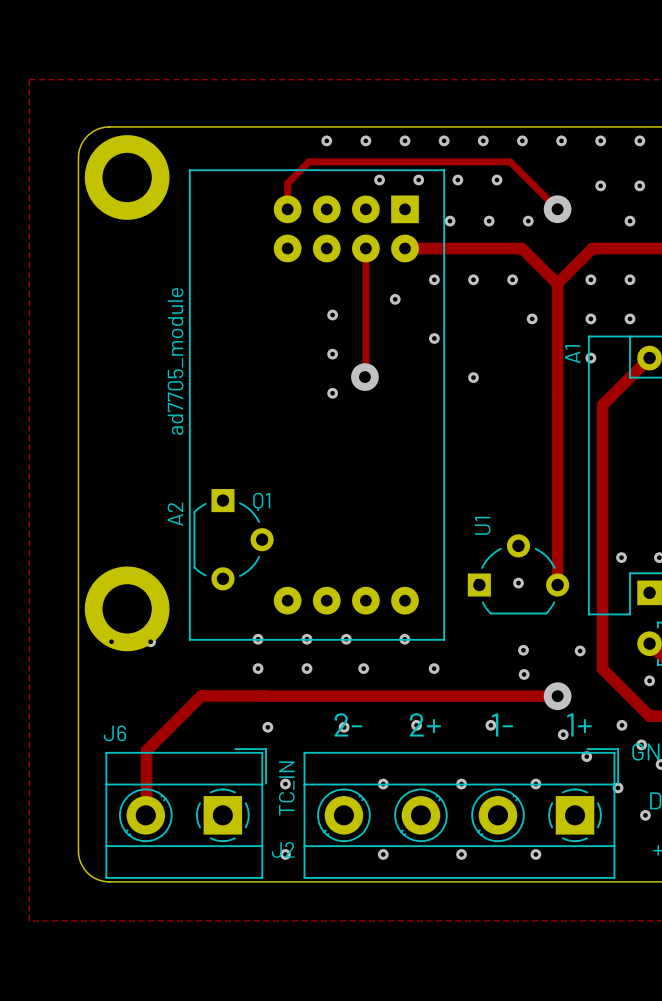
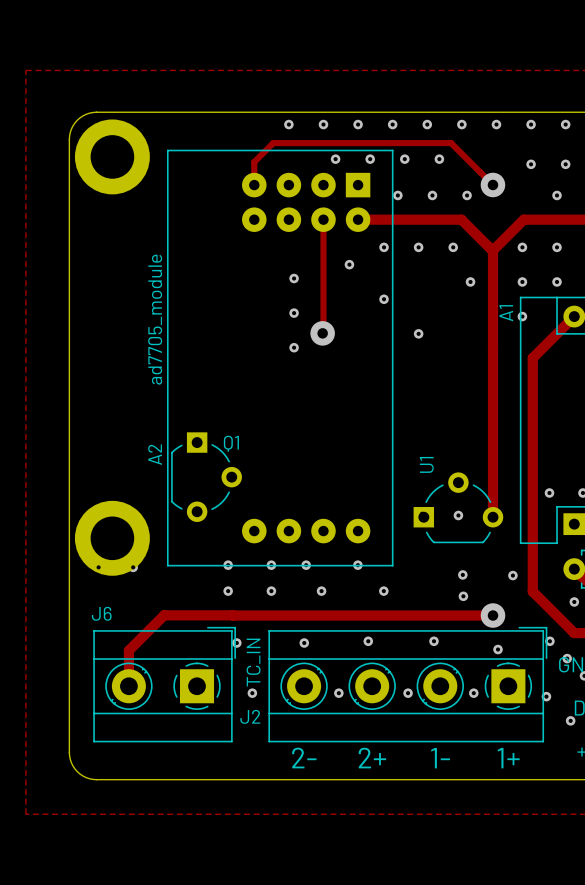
track: (201, 695) (146, 750) (145, 815) -> (177, 615) (164, 615) (128, 650) (128, 686)
text position: 2- (348, 724) -> 2- (304, 758)
text position: 2+ (425, 724) -> 2+ (372, 758)
text position: 1- (502, 725) -> 1- (440, 758)
text position: 1+ (579, 725) -> 1+ (508, 758)
via: (586, 756) -> none
J6 position: (186, 813) -> (164, 684)
J2 position: (461, 813) -> (407, 684)
via: (285, 854) -> none
via: (383, 854) -> none
via: (461, 854) -> none
via: (535, 854) -> none

